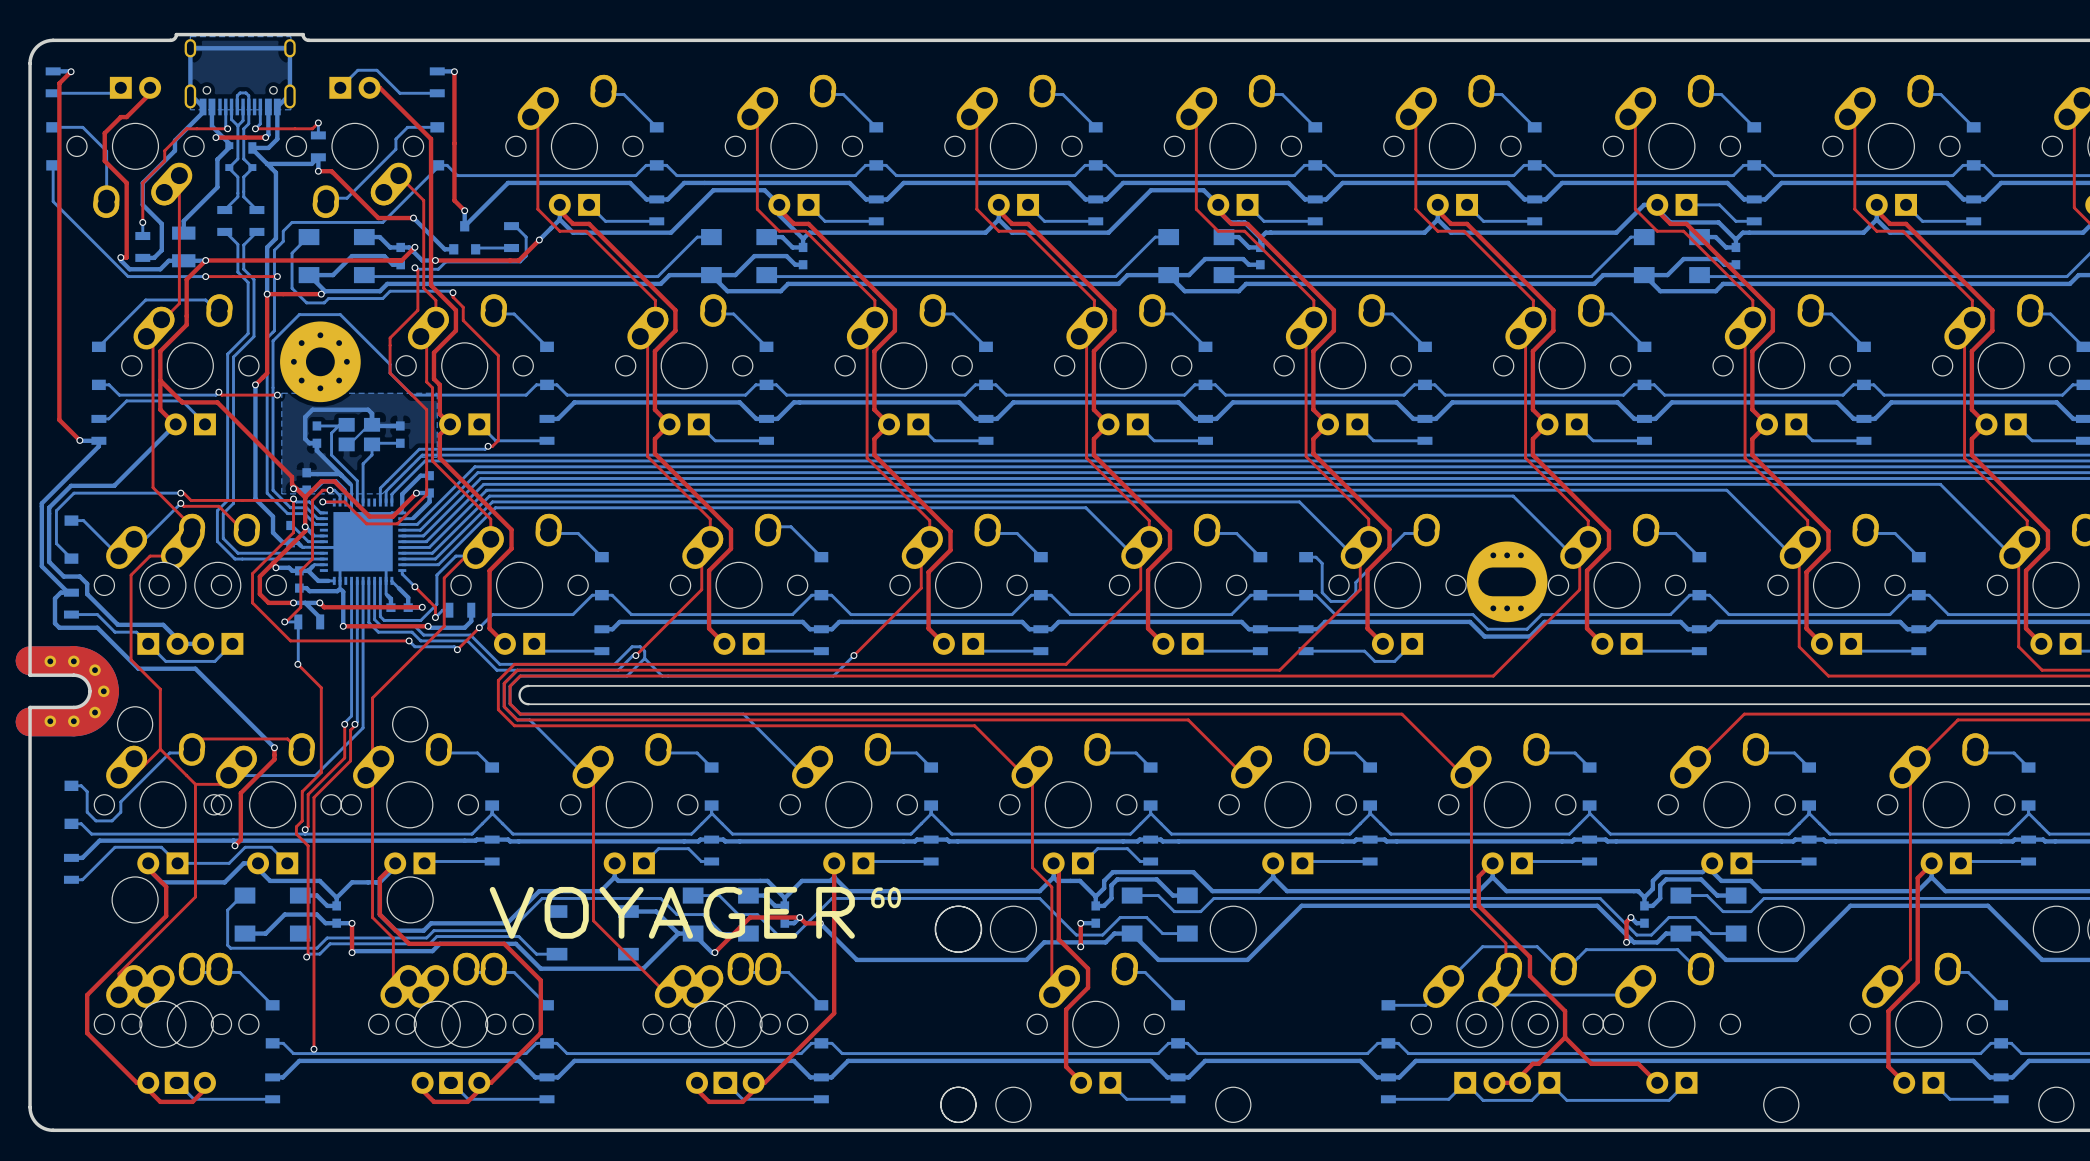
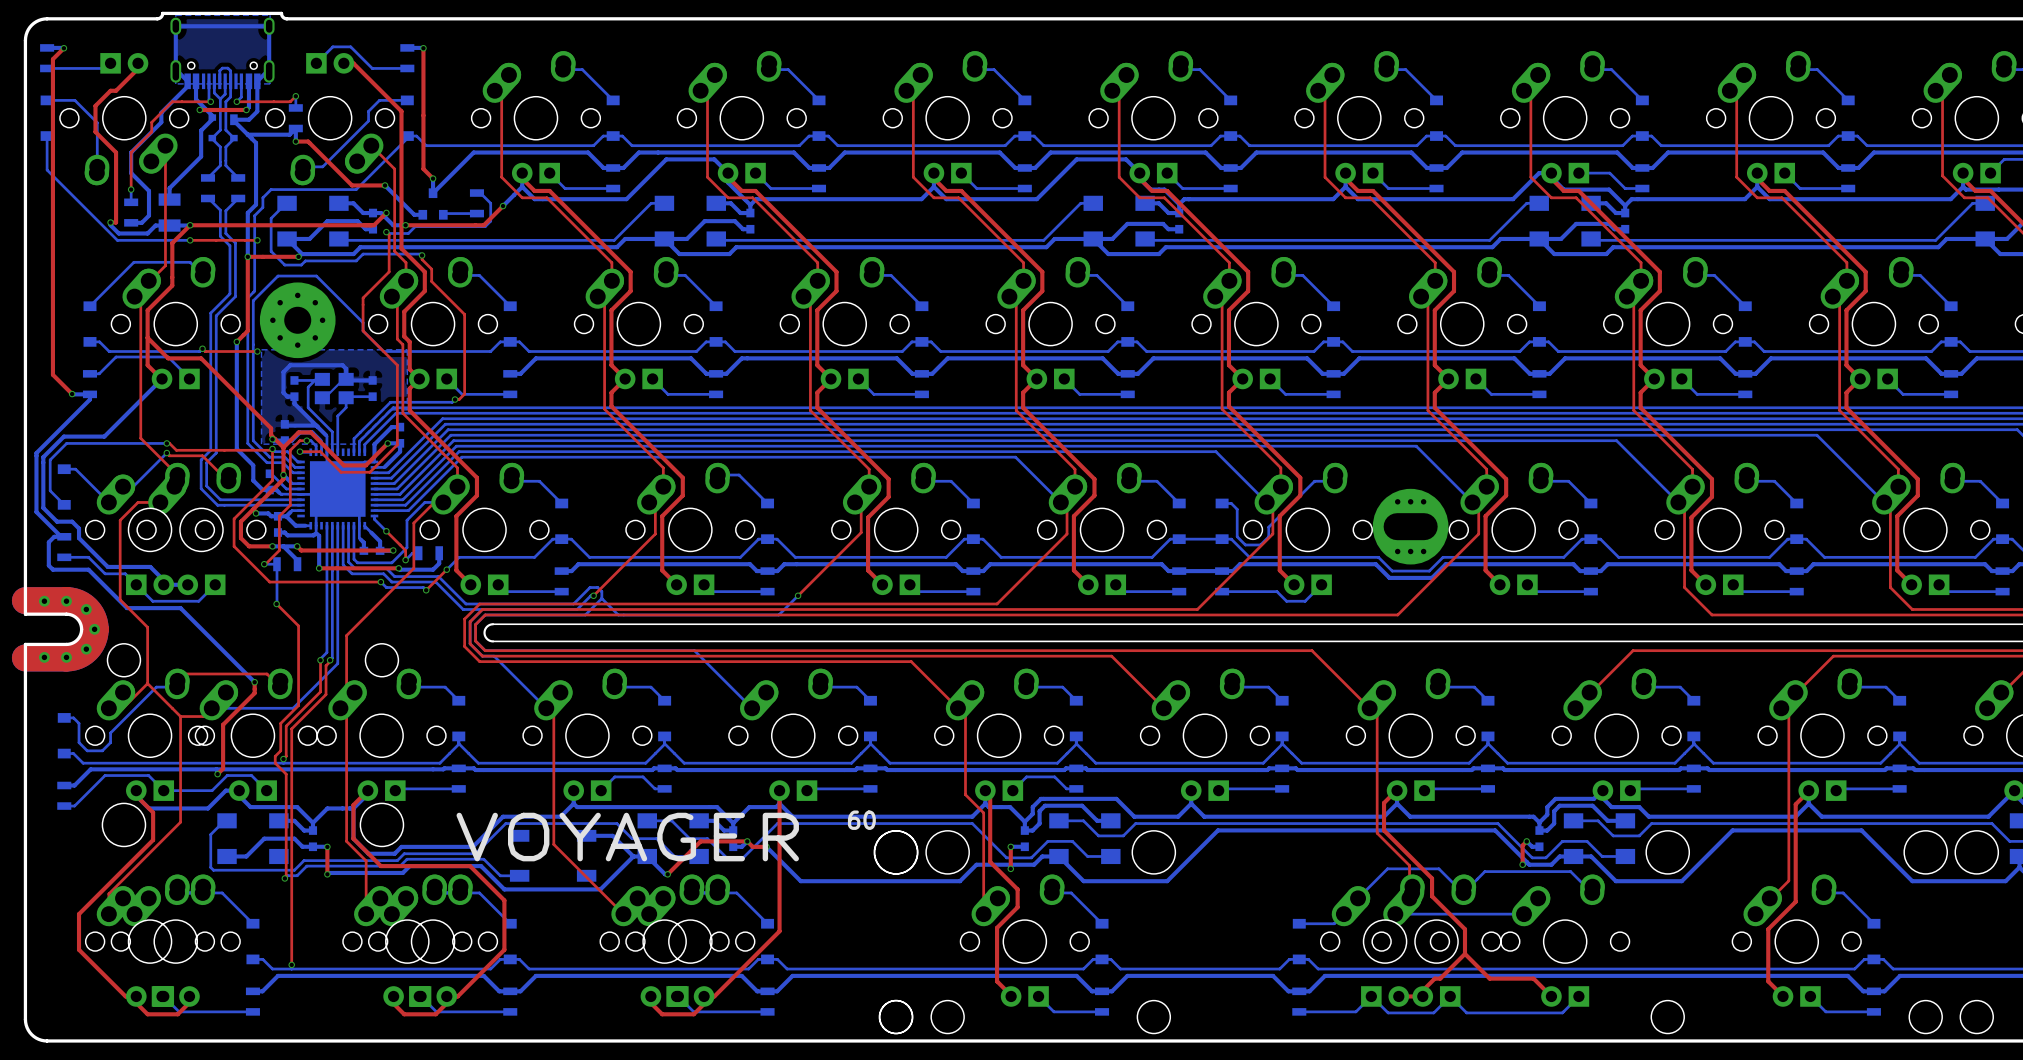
text position: 60 (886, 897) -> 60 (861, 820)

